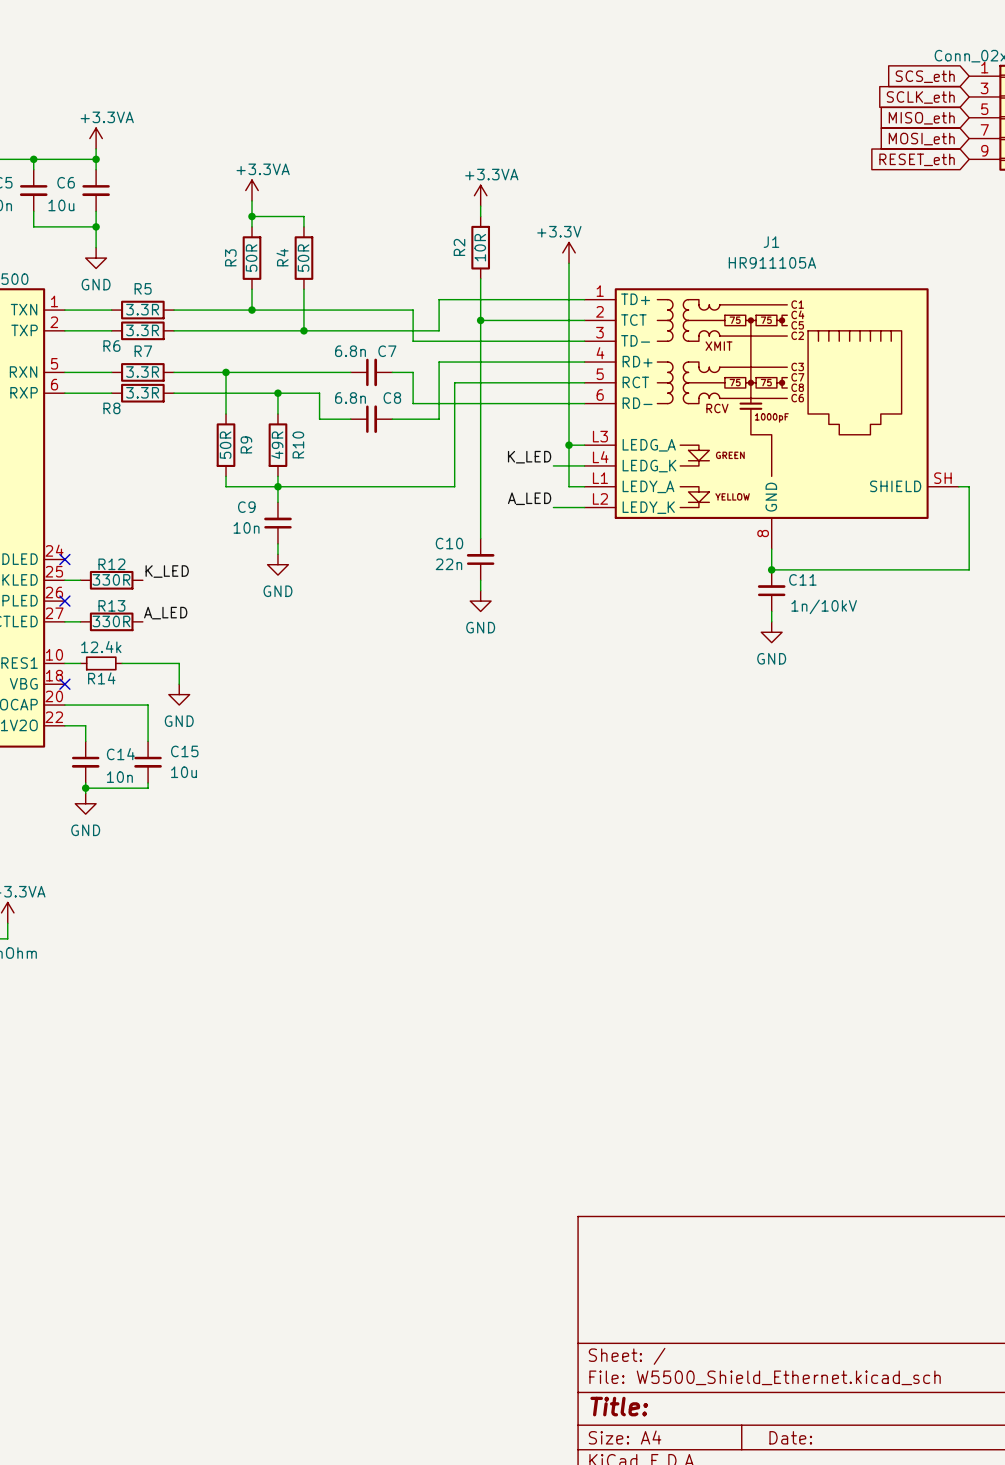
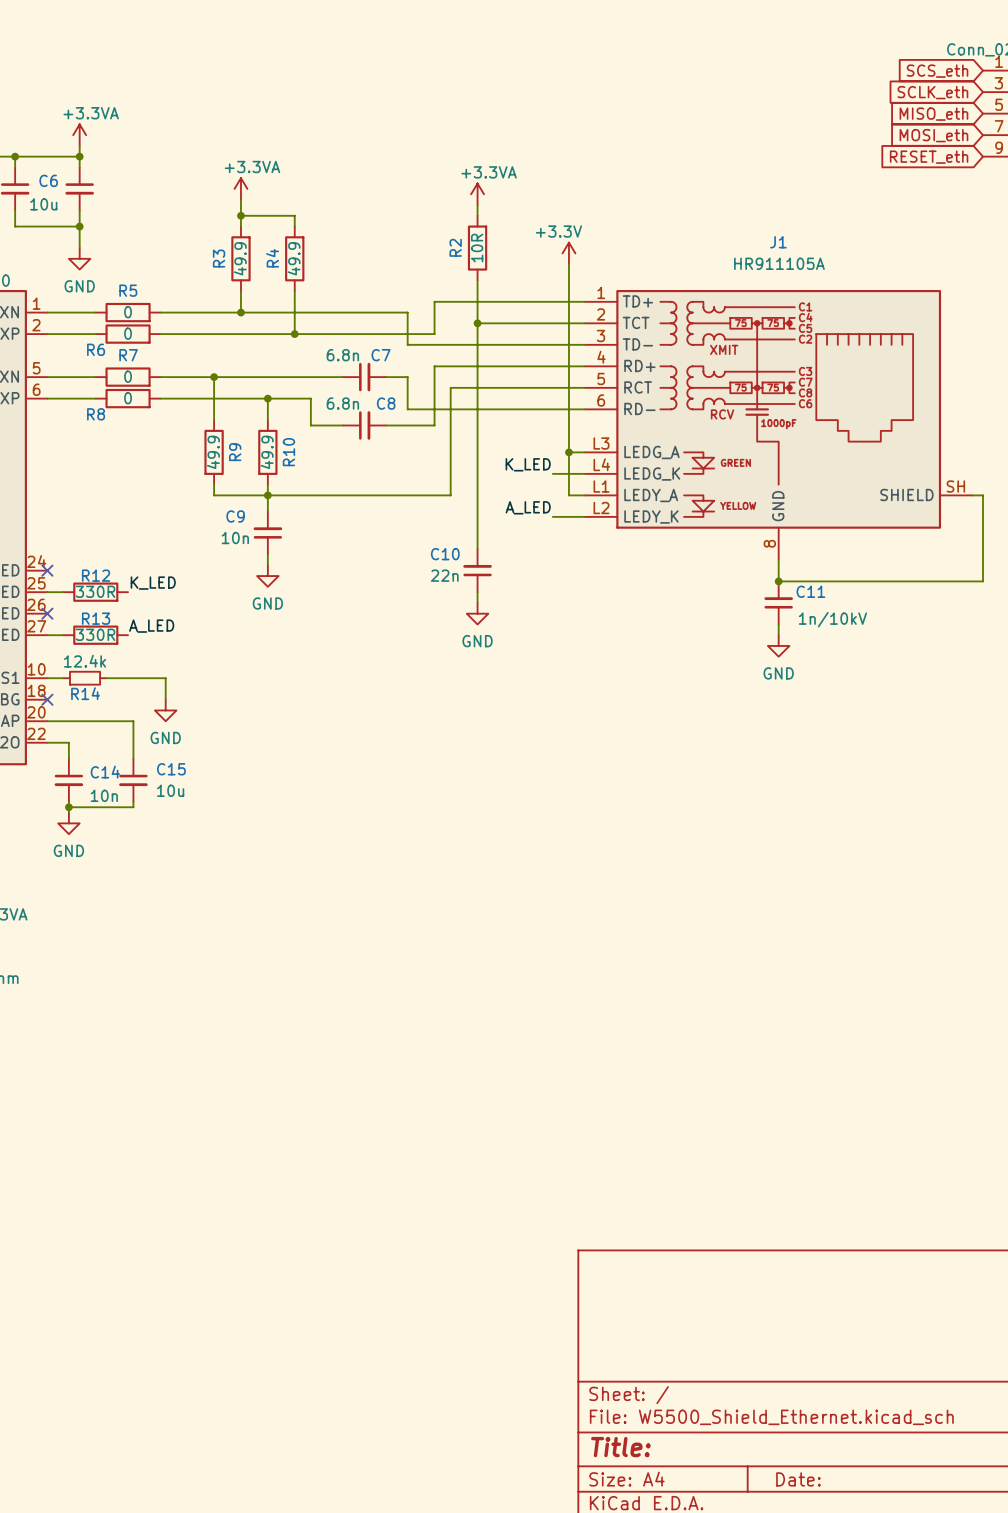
R3 value: 50R (251, 258) -> 49.9 (240, 258)
R4 value: 50R (303, 258) -> 49.9 (294, 258)
R5 value: 3.3R (142, 309) -> 0 (128, 312)
R6 value: 3.3R (142, 330) -> 0 (128, 333)
R7 value: 3.3R (142, 372) -> 0 (128, 376)
R8 value: 3.3R (142, 392) -> 0 (128, 398)
R9 value: 50R (225, 445) -> 49.9 (213, 452)
R10 value: 49R (277, 445) -> 49.9 (267, 452)

